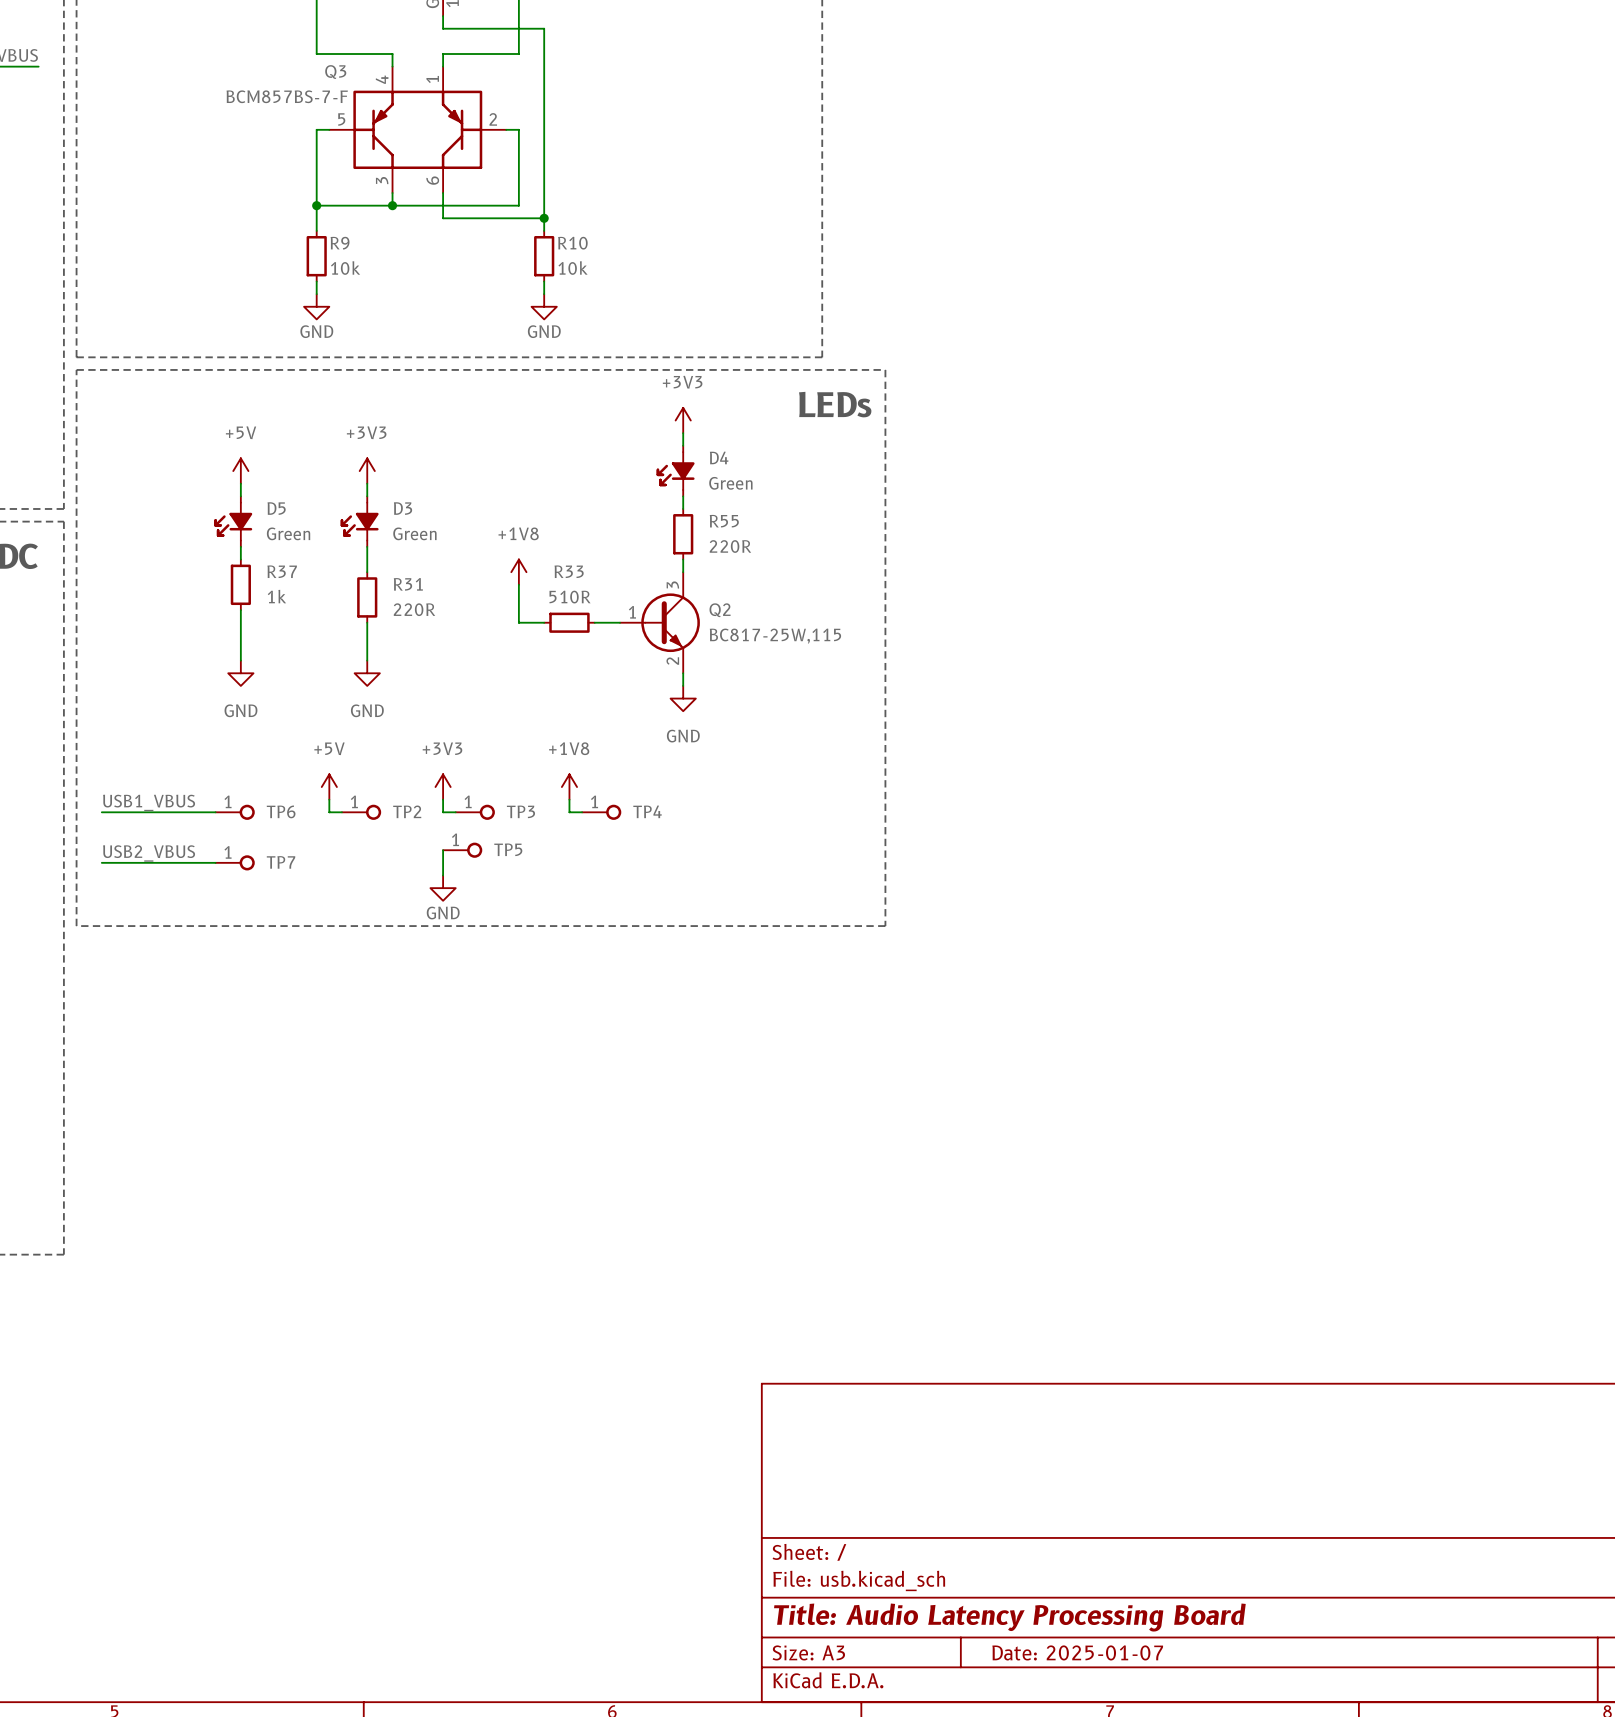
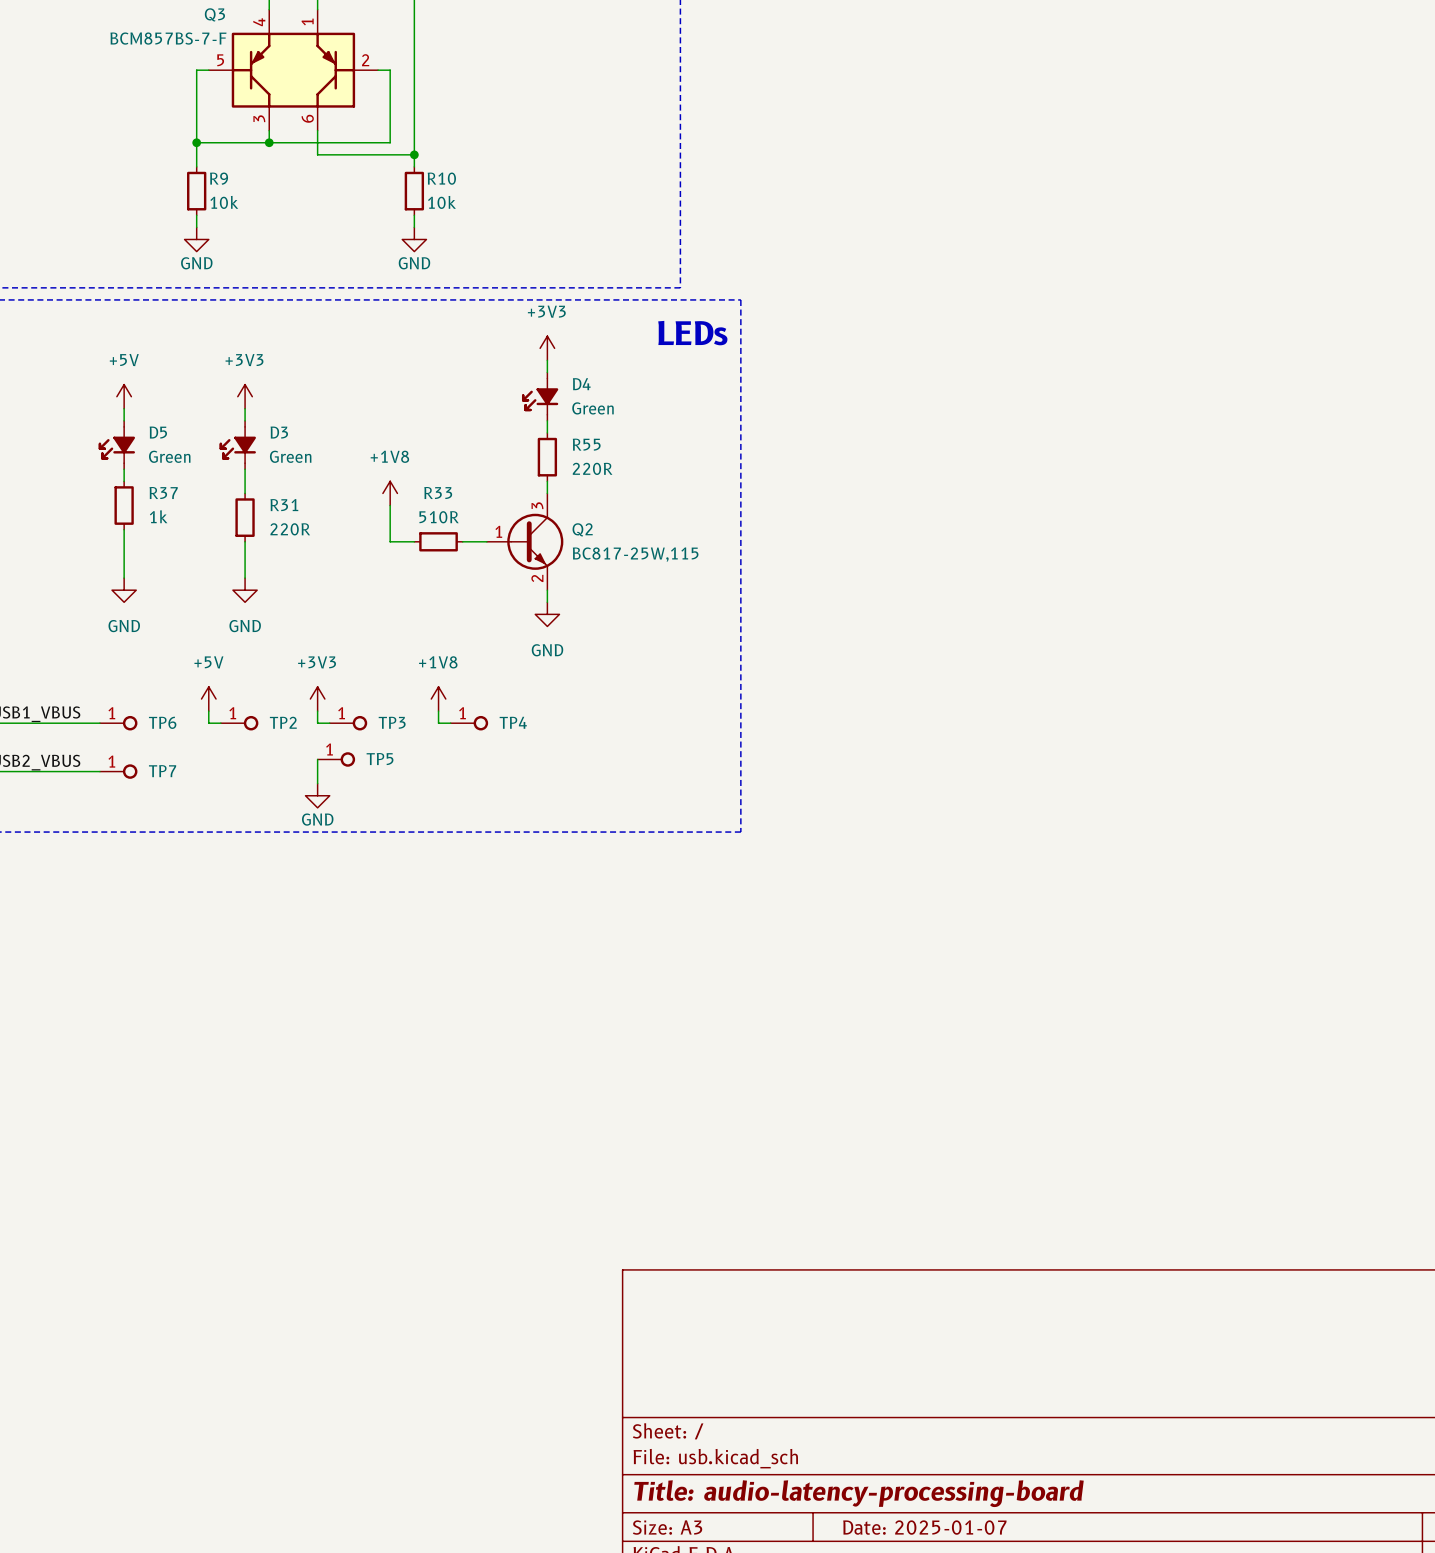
title block: Title: Audio Latency Processing Board (1009, 1617) -> Title: audio-latency-processing-board (859, 1493)

